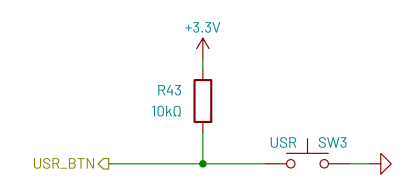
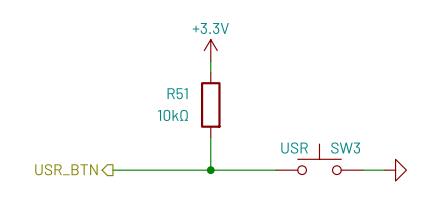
R43 name: R43 (169, 90) -> R51 (177, 93)

